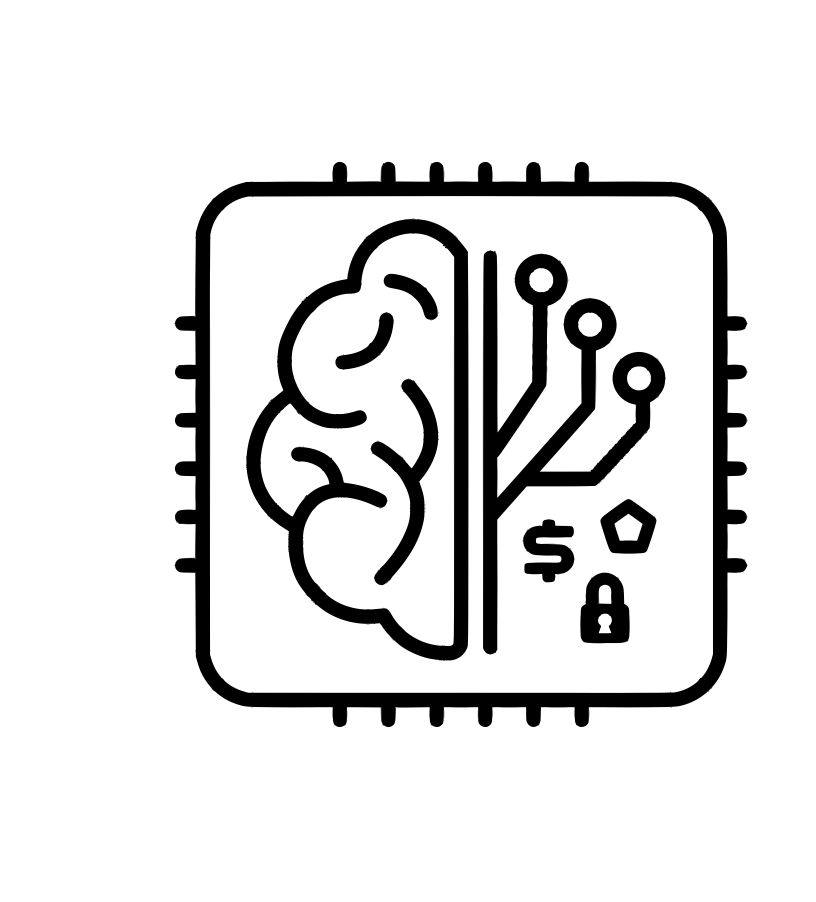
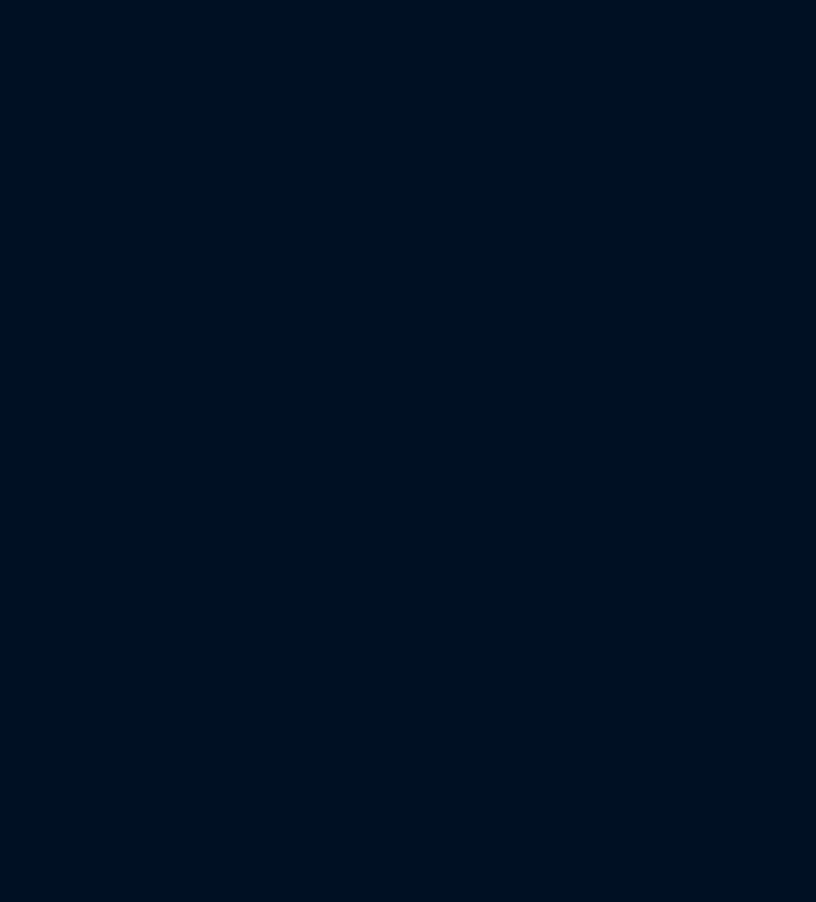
drawing: [174, 161, 748, 728] -> none

